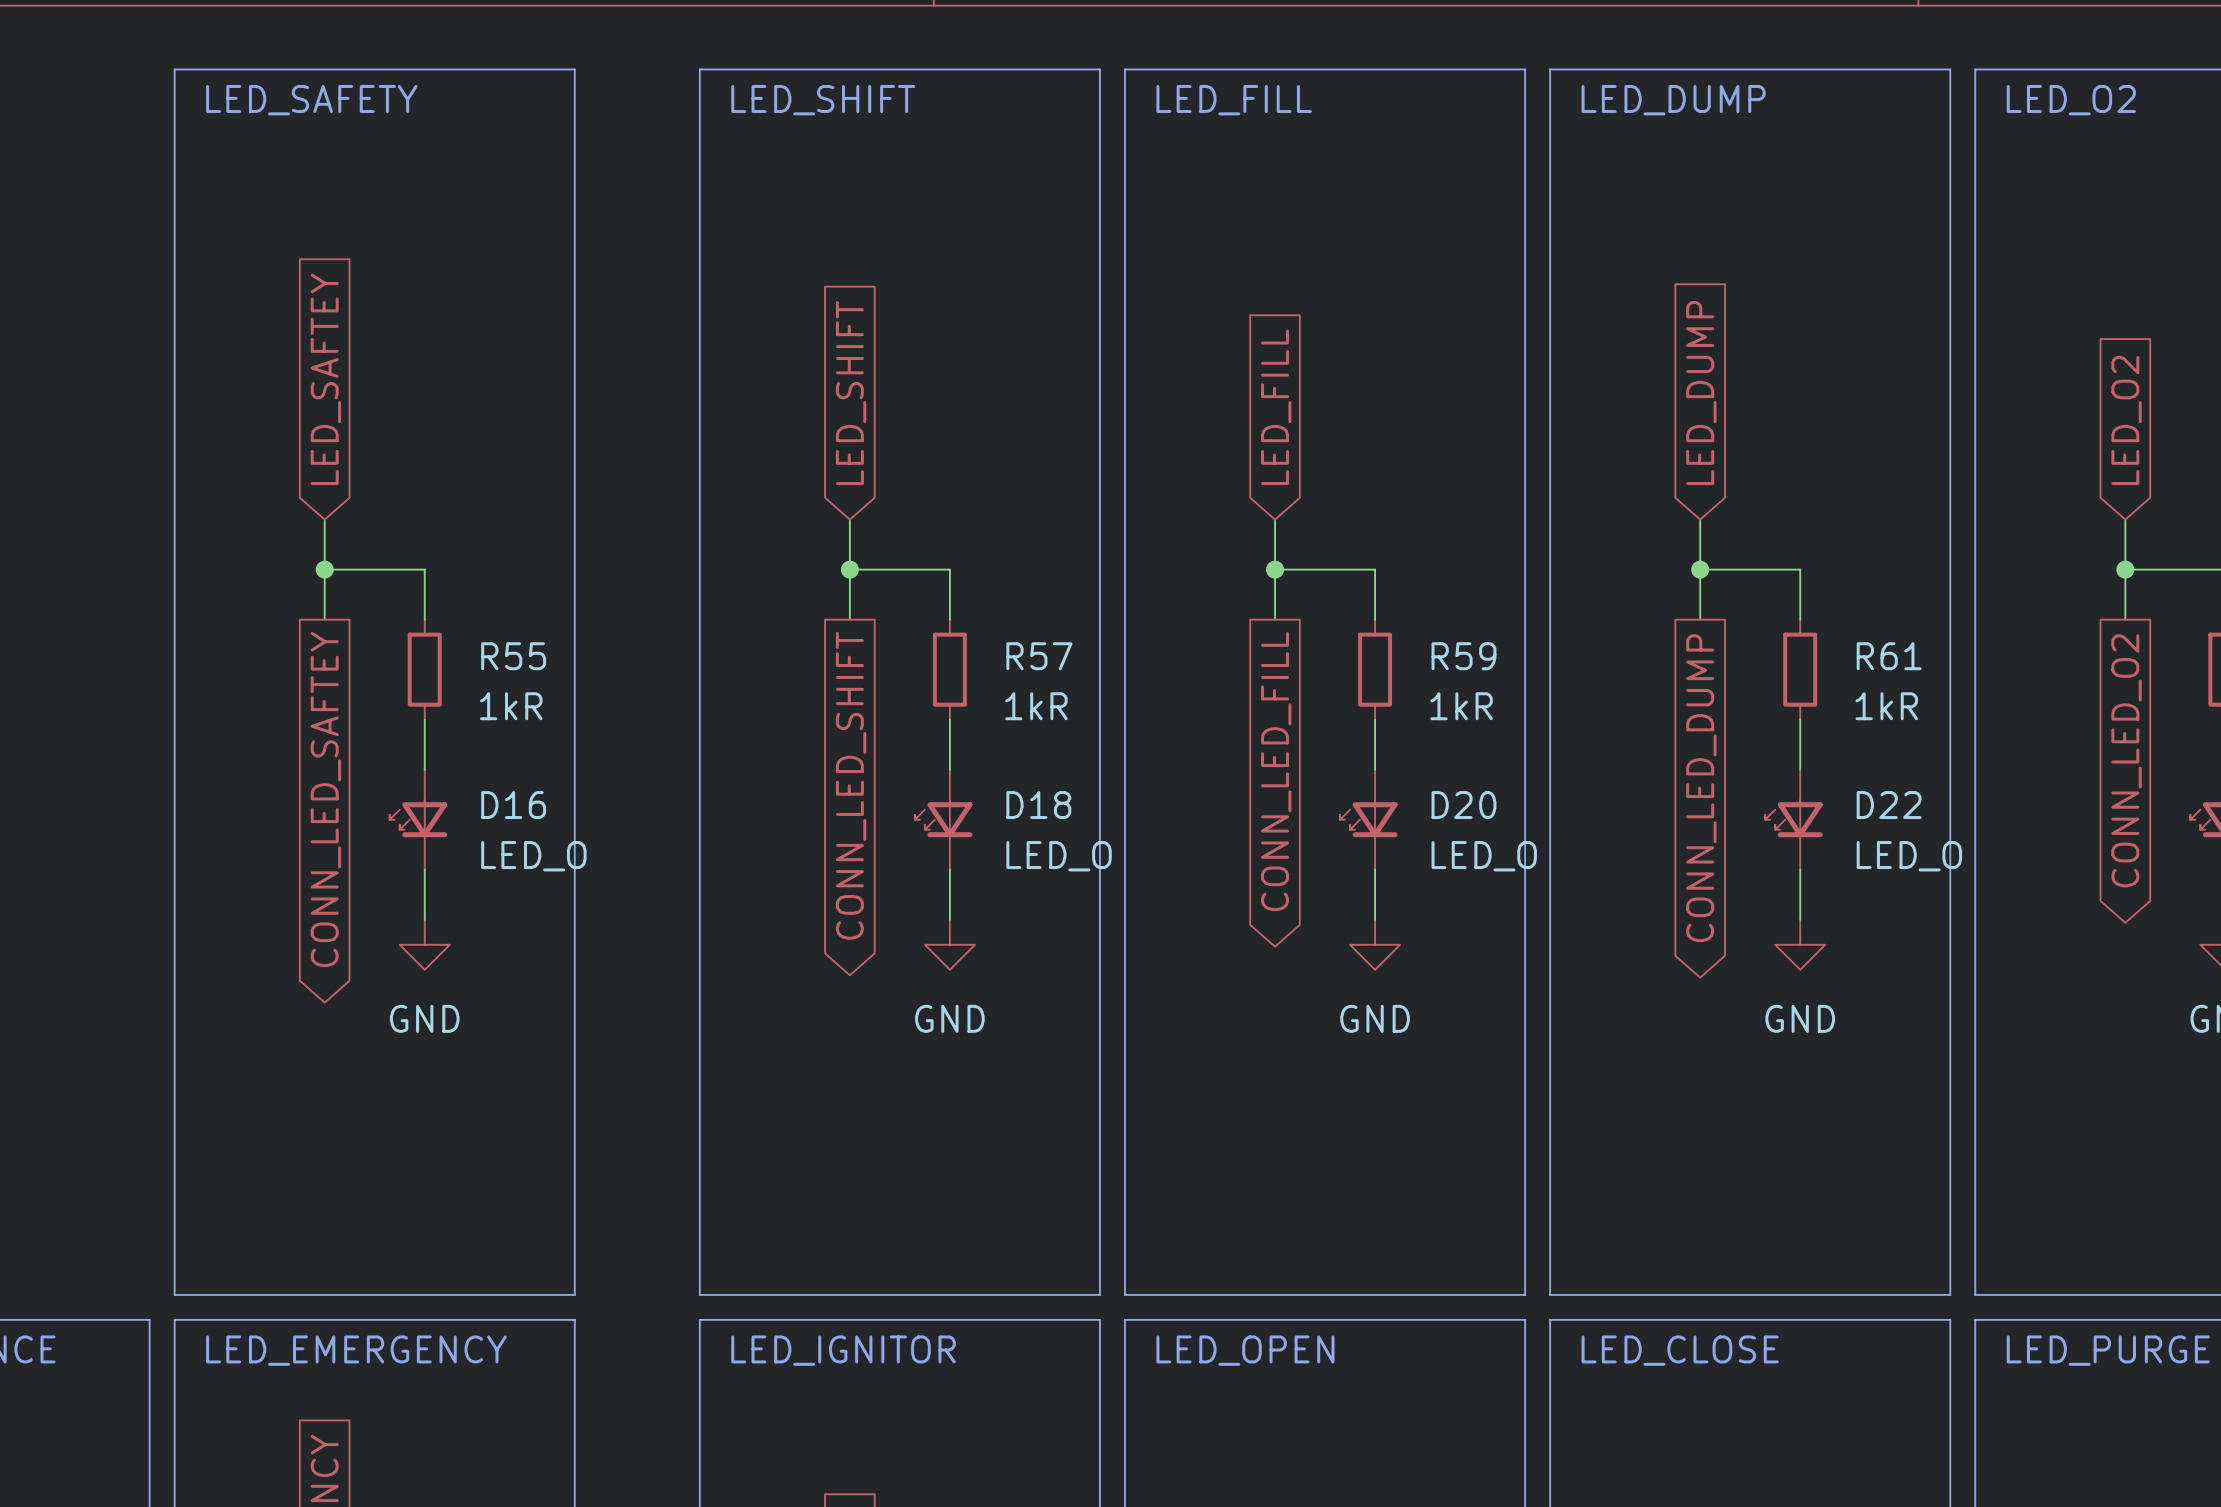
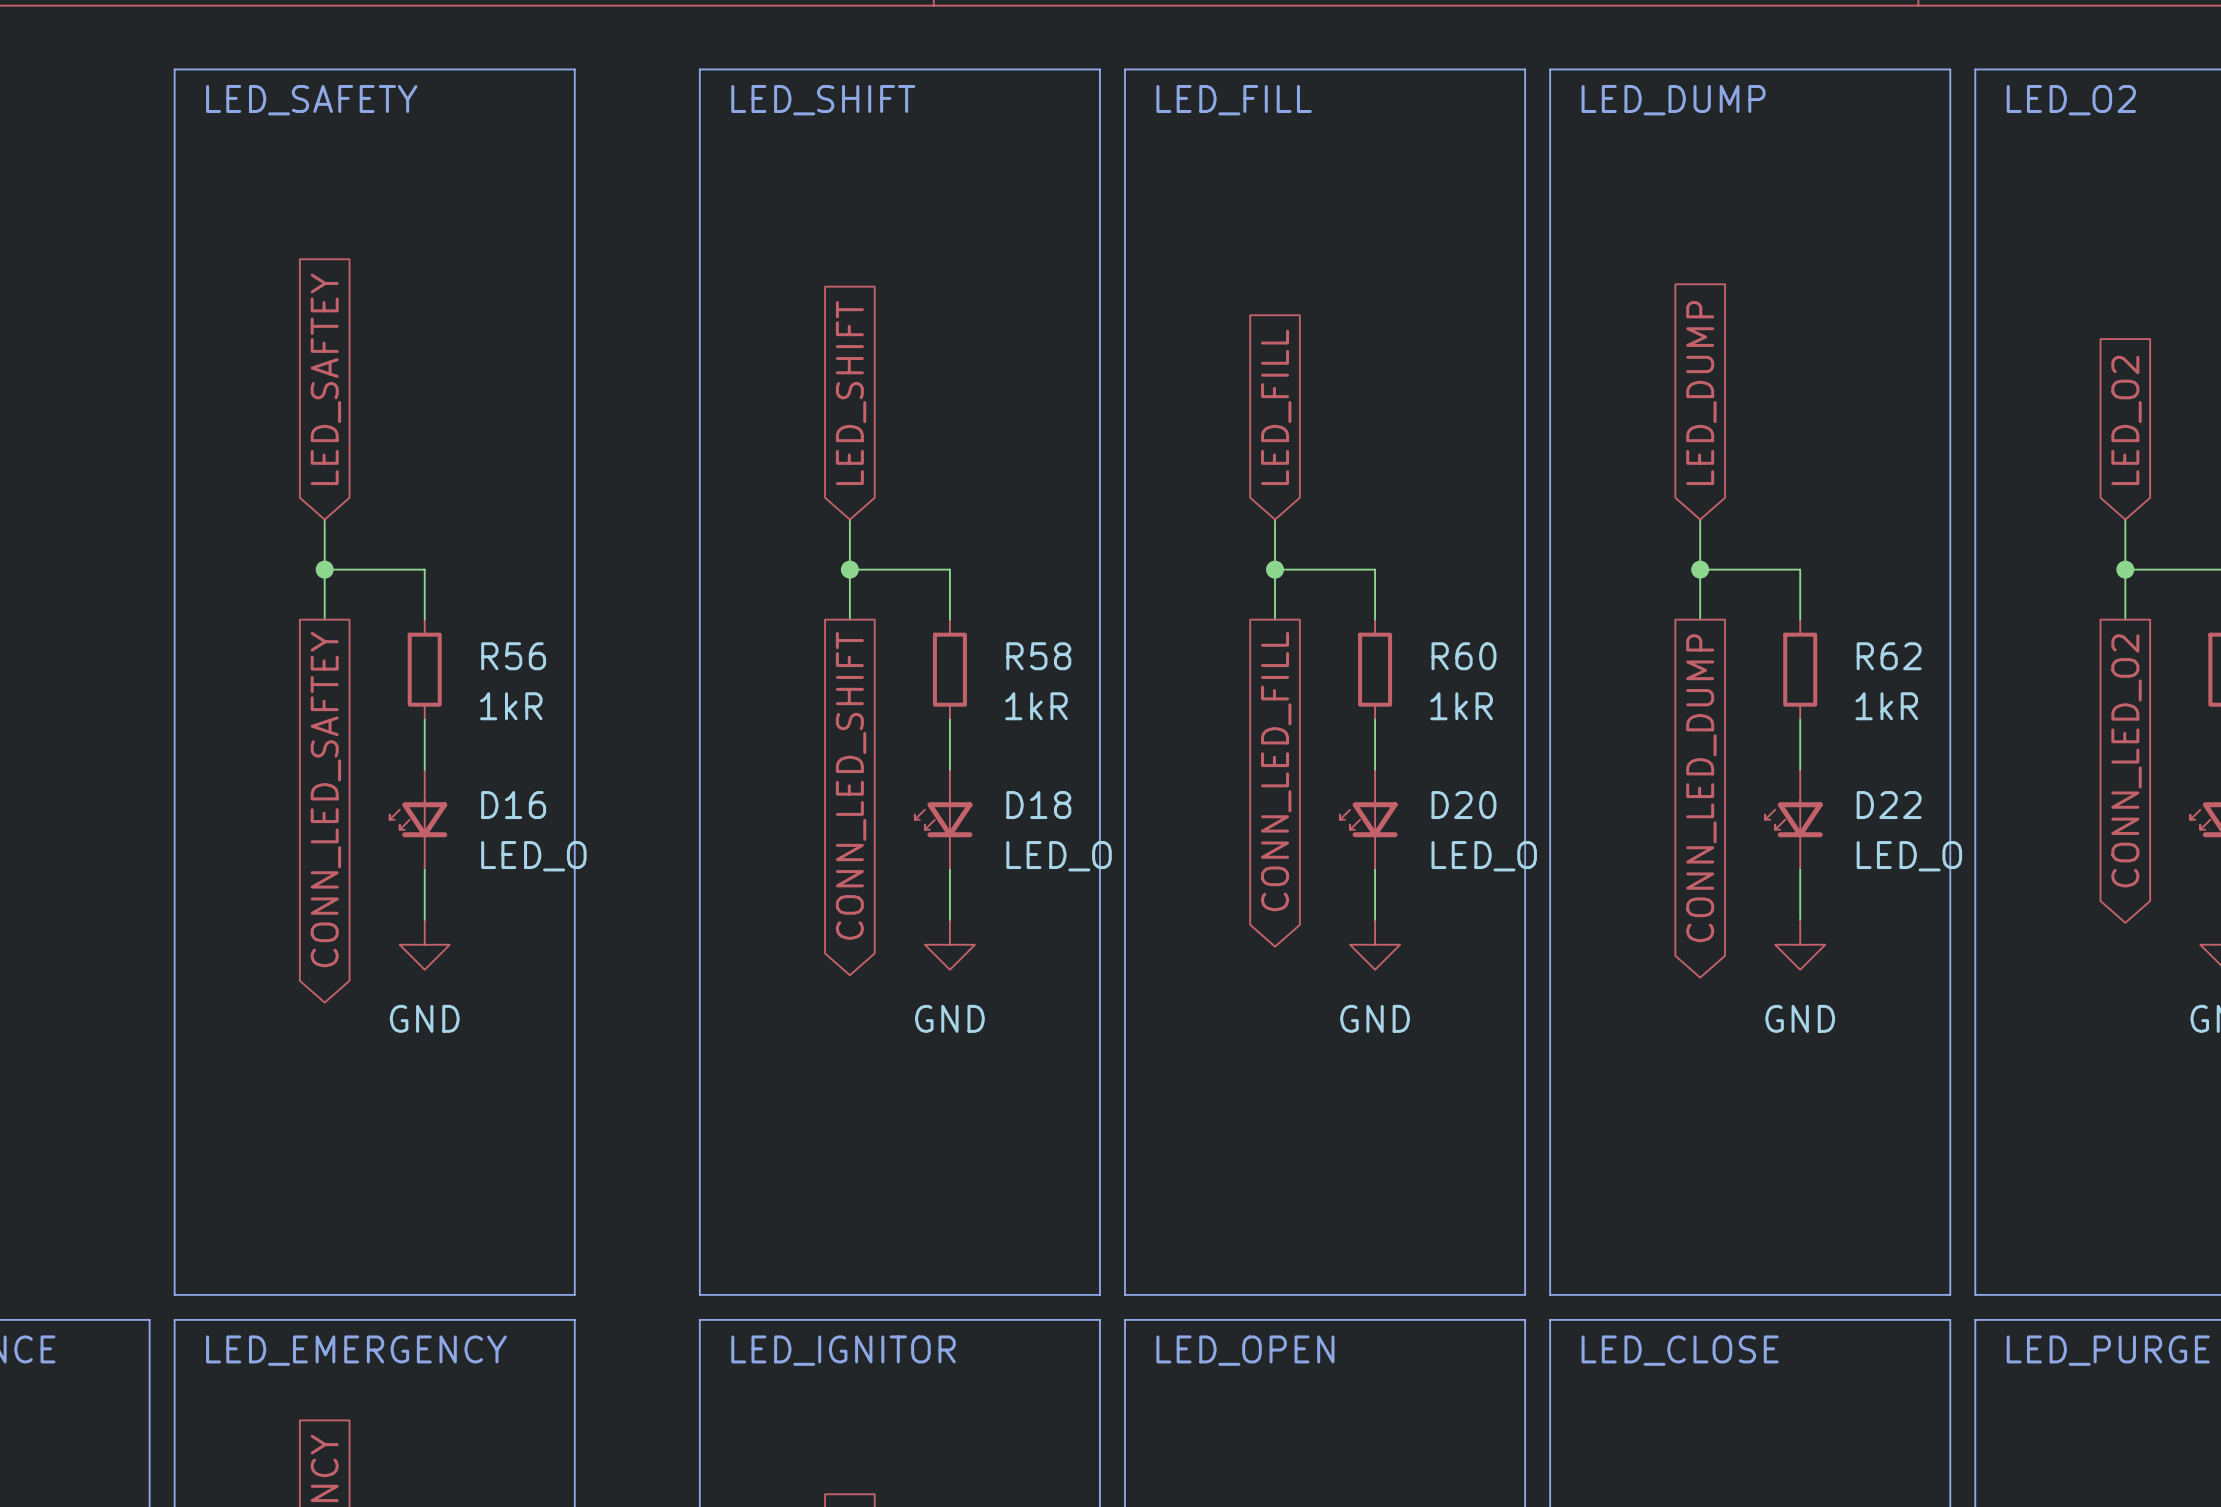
R55 name: R55 (513, 656) -> R56 (513, 656)
R57 name: R57 (1039, 656) -> R58 (1038, 656)
R59 name: R59 (1463, 656) -> R60 (1463, 656)
R61 name: R61 (1889, 656) -> R62 (1889, 656)

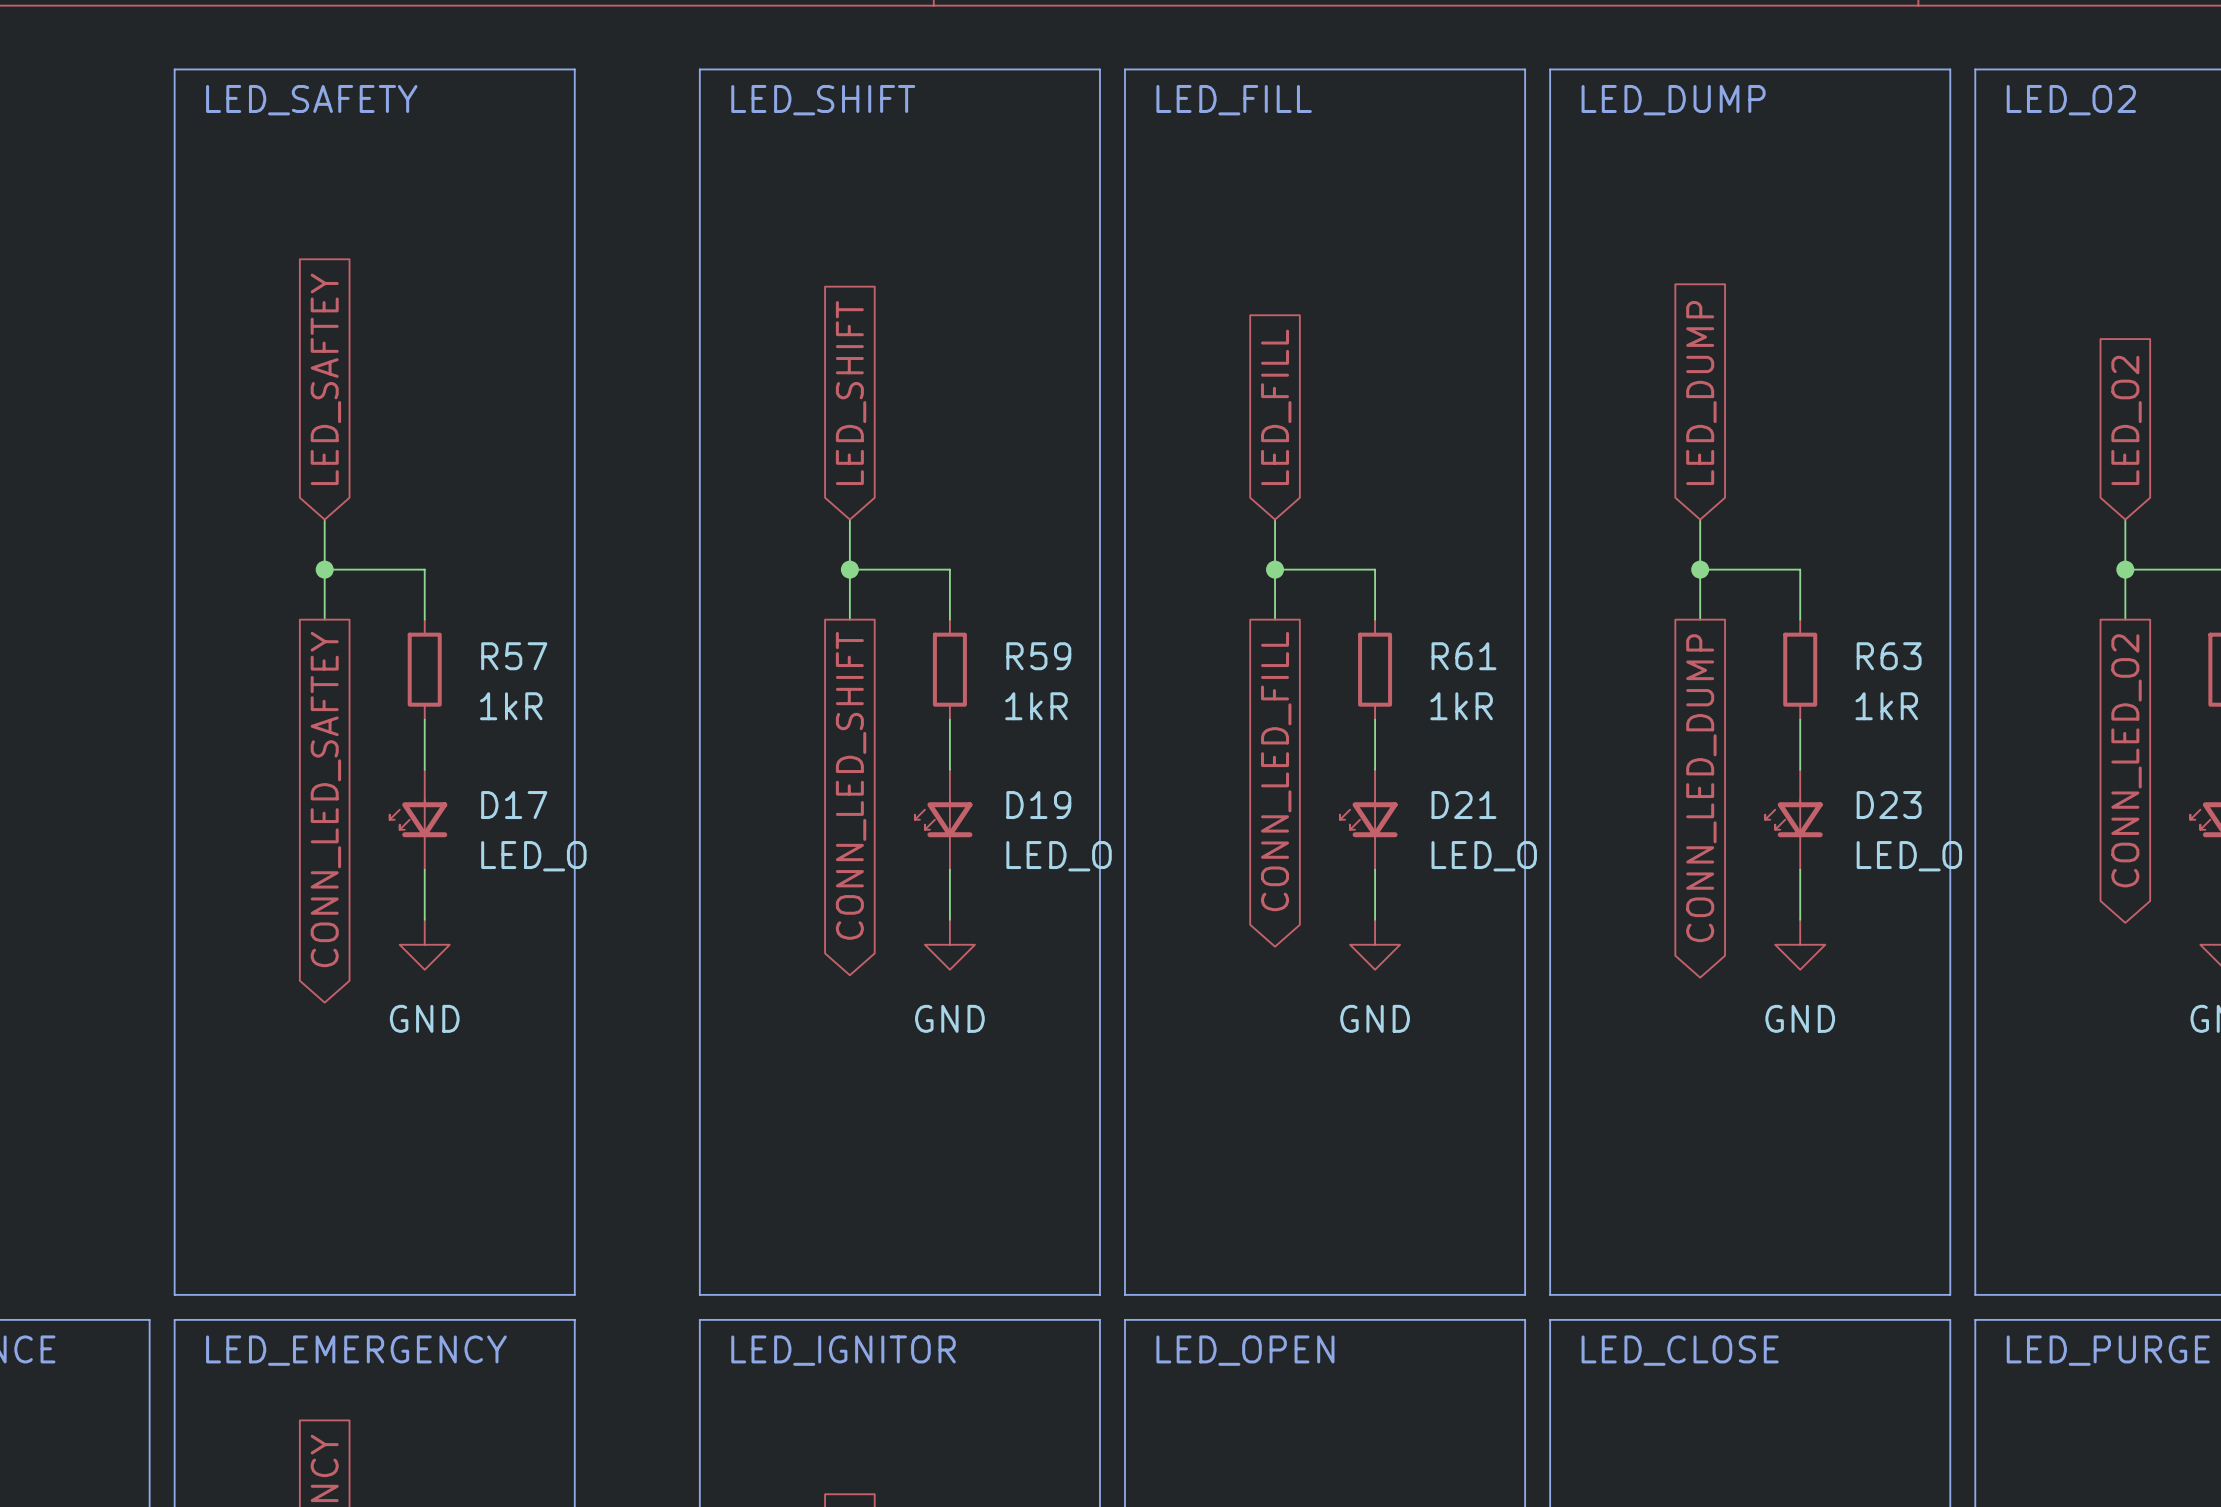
R56 name: R56 (513, 656) -> R57 (514, 656)
R58 name: R58 (1038, 656) -> R59 (1038, 656)
R60 name: R60 (1463, 656) -> R61 (1463, 656)
R62 name: R62 (1889, 656) -> R63 (1889, 656)
D16 name: D16 (513, 805) -> D17 (514, 805)
D18 name: D18 (1038, 805) -> D19 (1038, 805)
D20 name: D20 (1463, 805) -> D21 (1463, 805)
D22 name: D22 (1889, 805) -> D23 (1889, 805)

